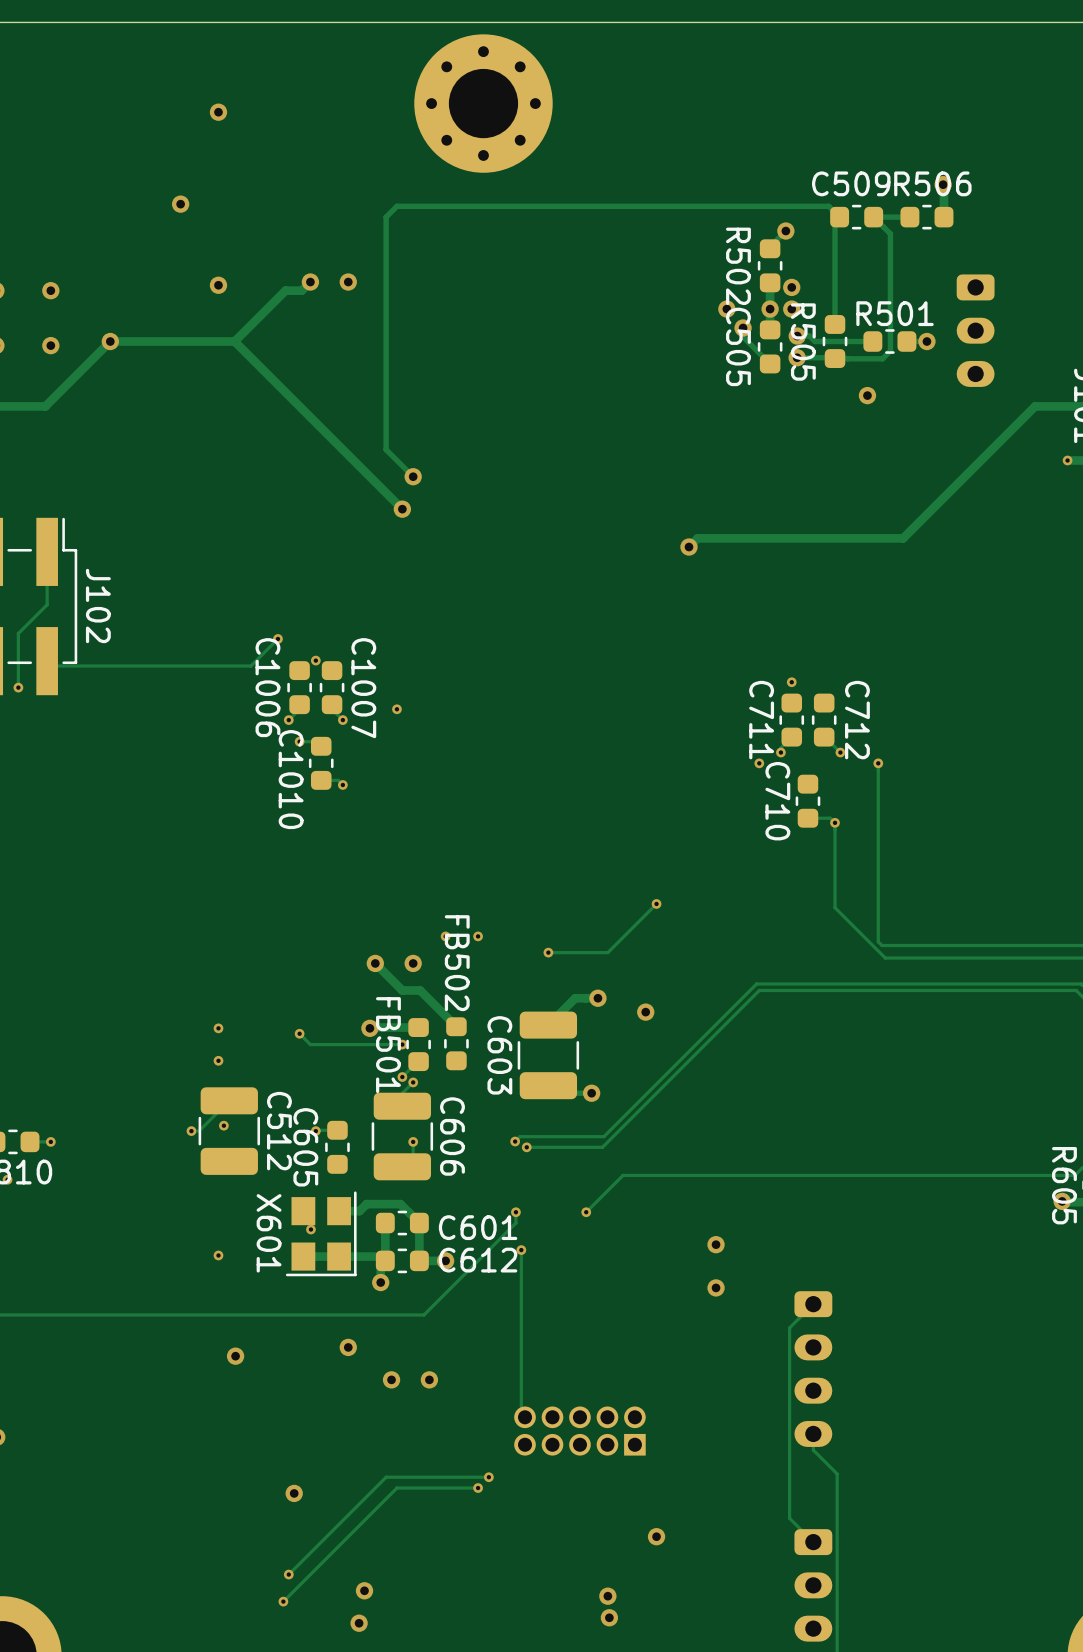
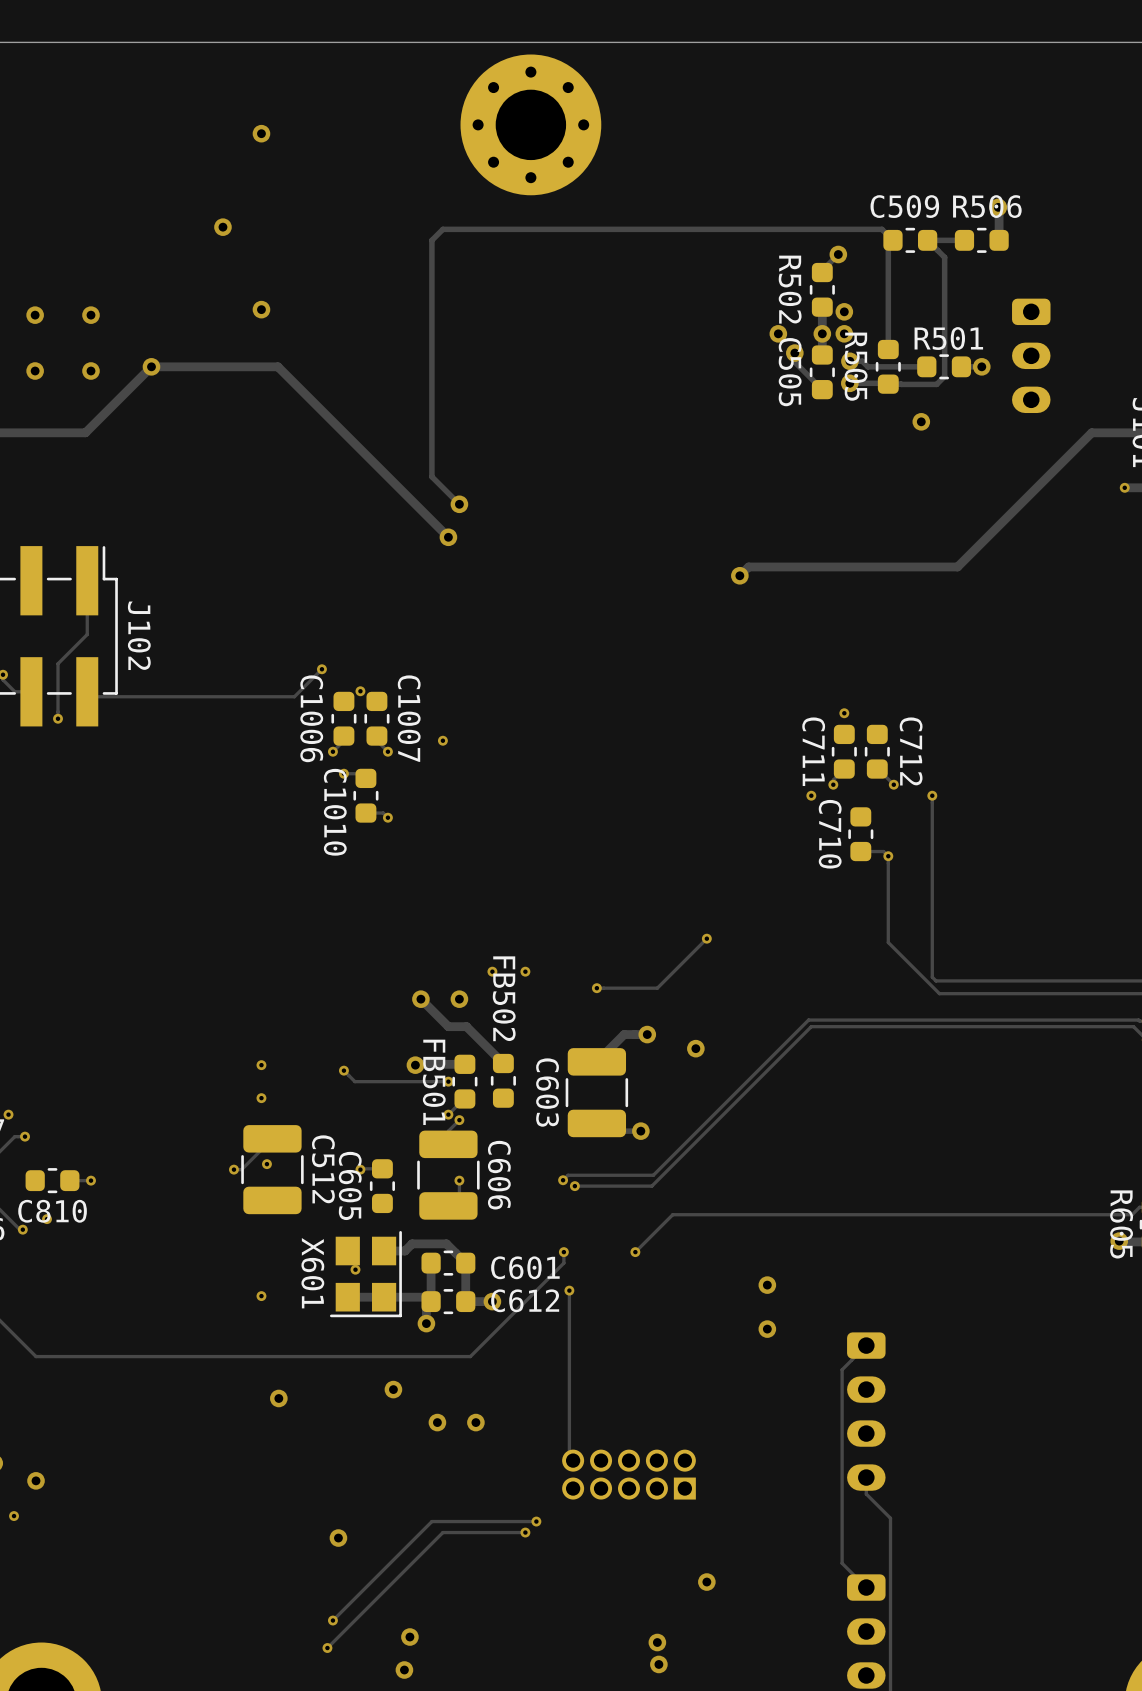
track: (310, 282) (301, 290) (285, 290) (234, 341) -> none
via: (310, 282) -> none
via: (348, 282) -> none

